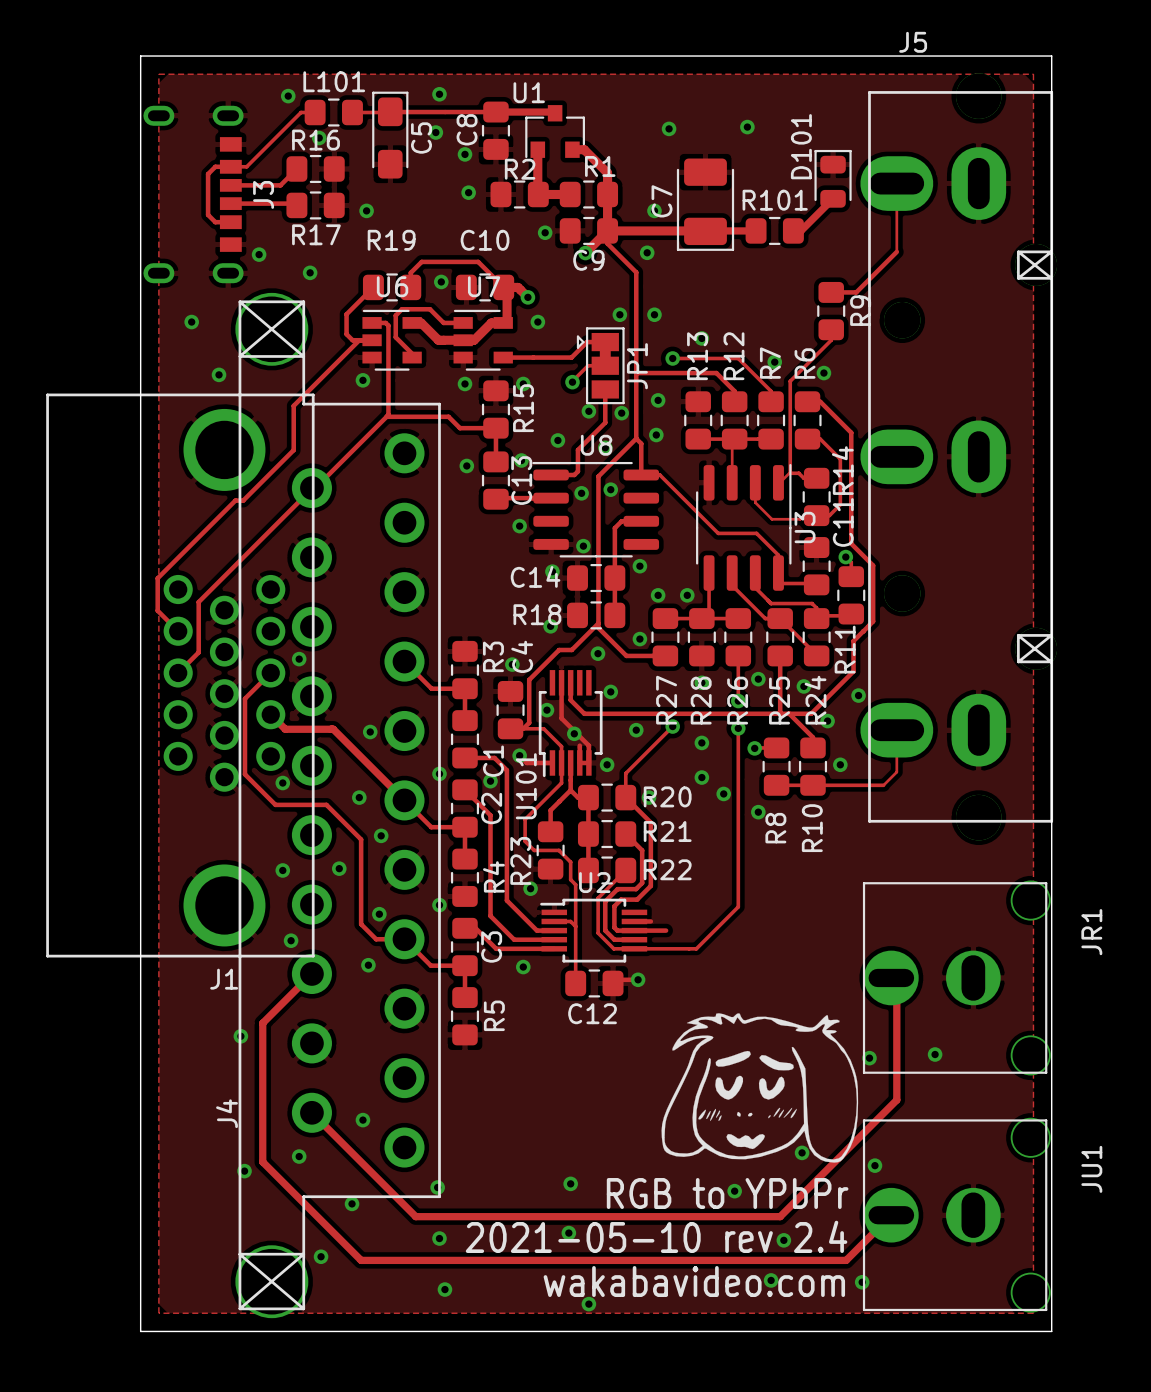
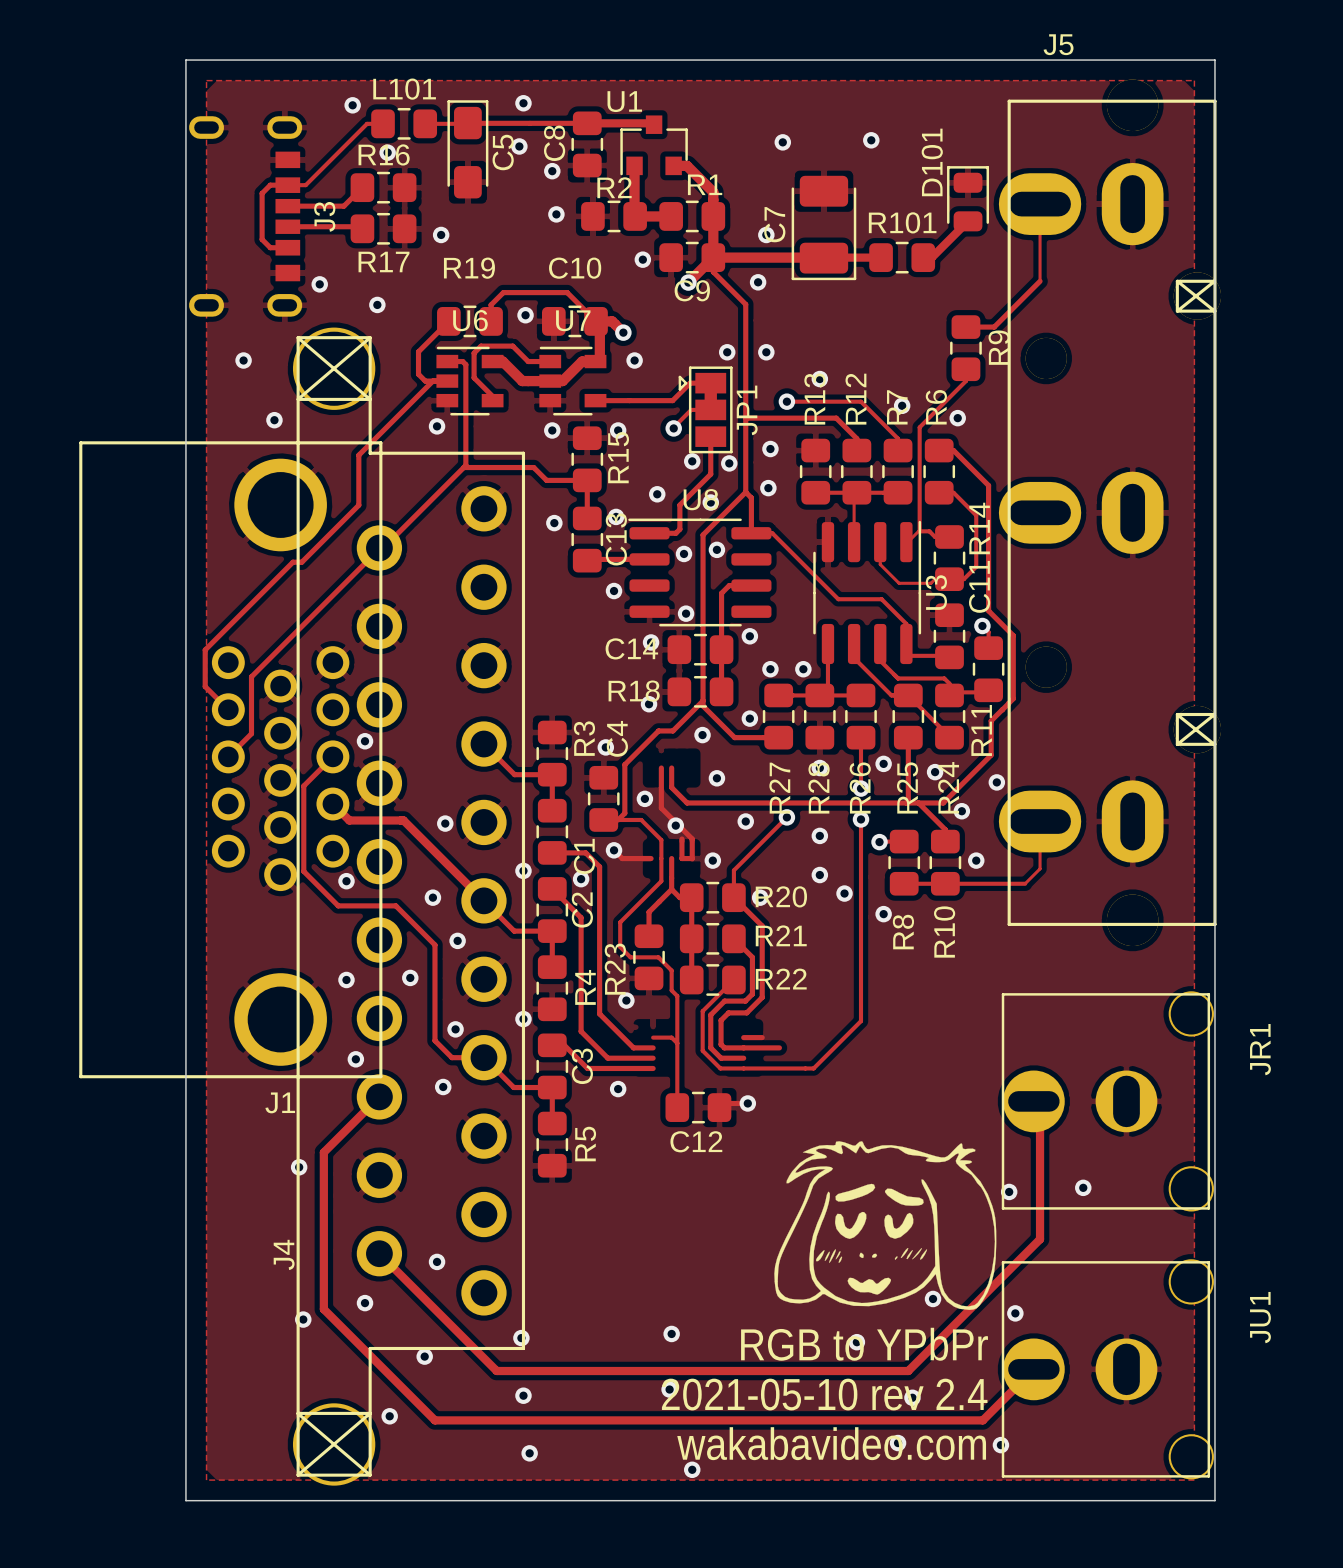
U101: (570, 723) -> none
U2: (593, 930) -> none

